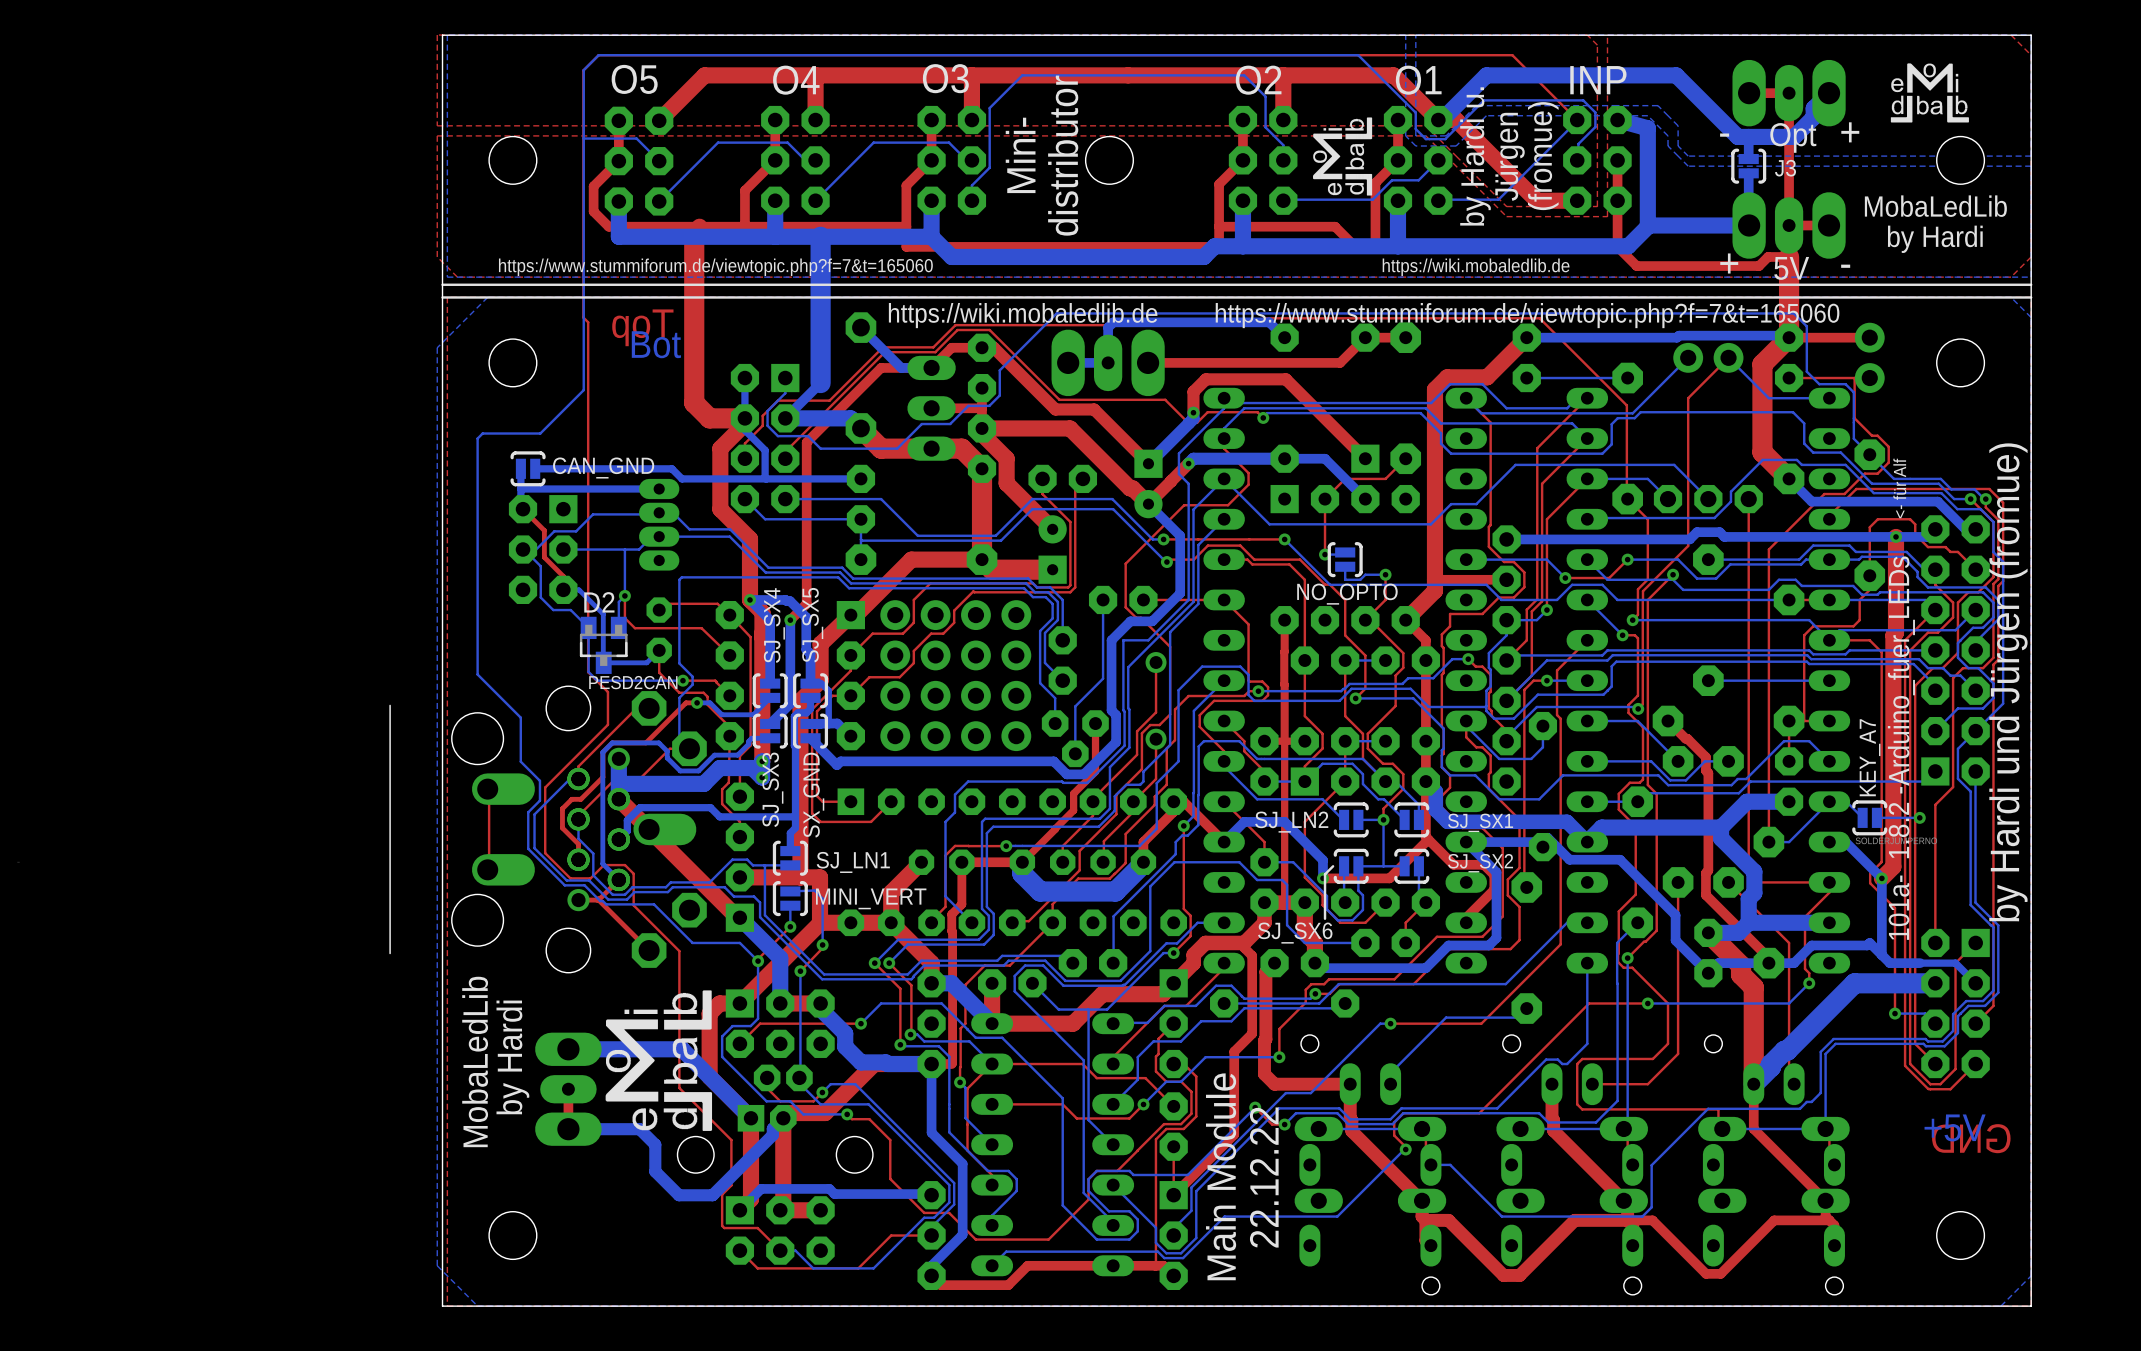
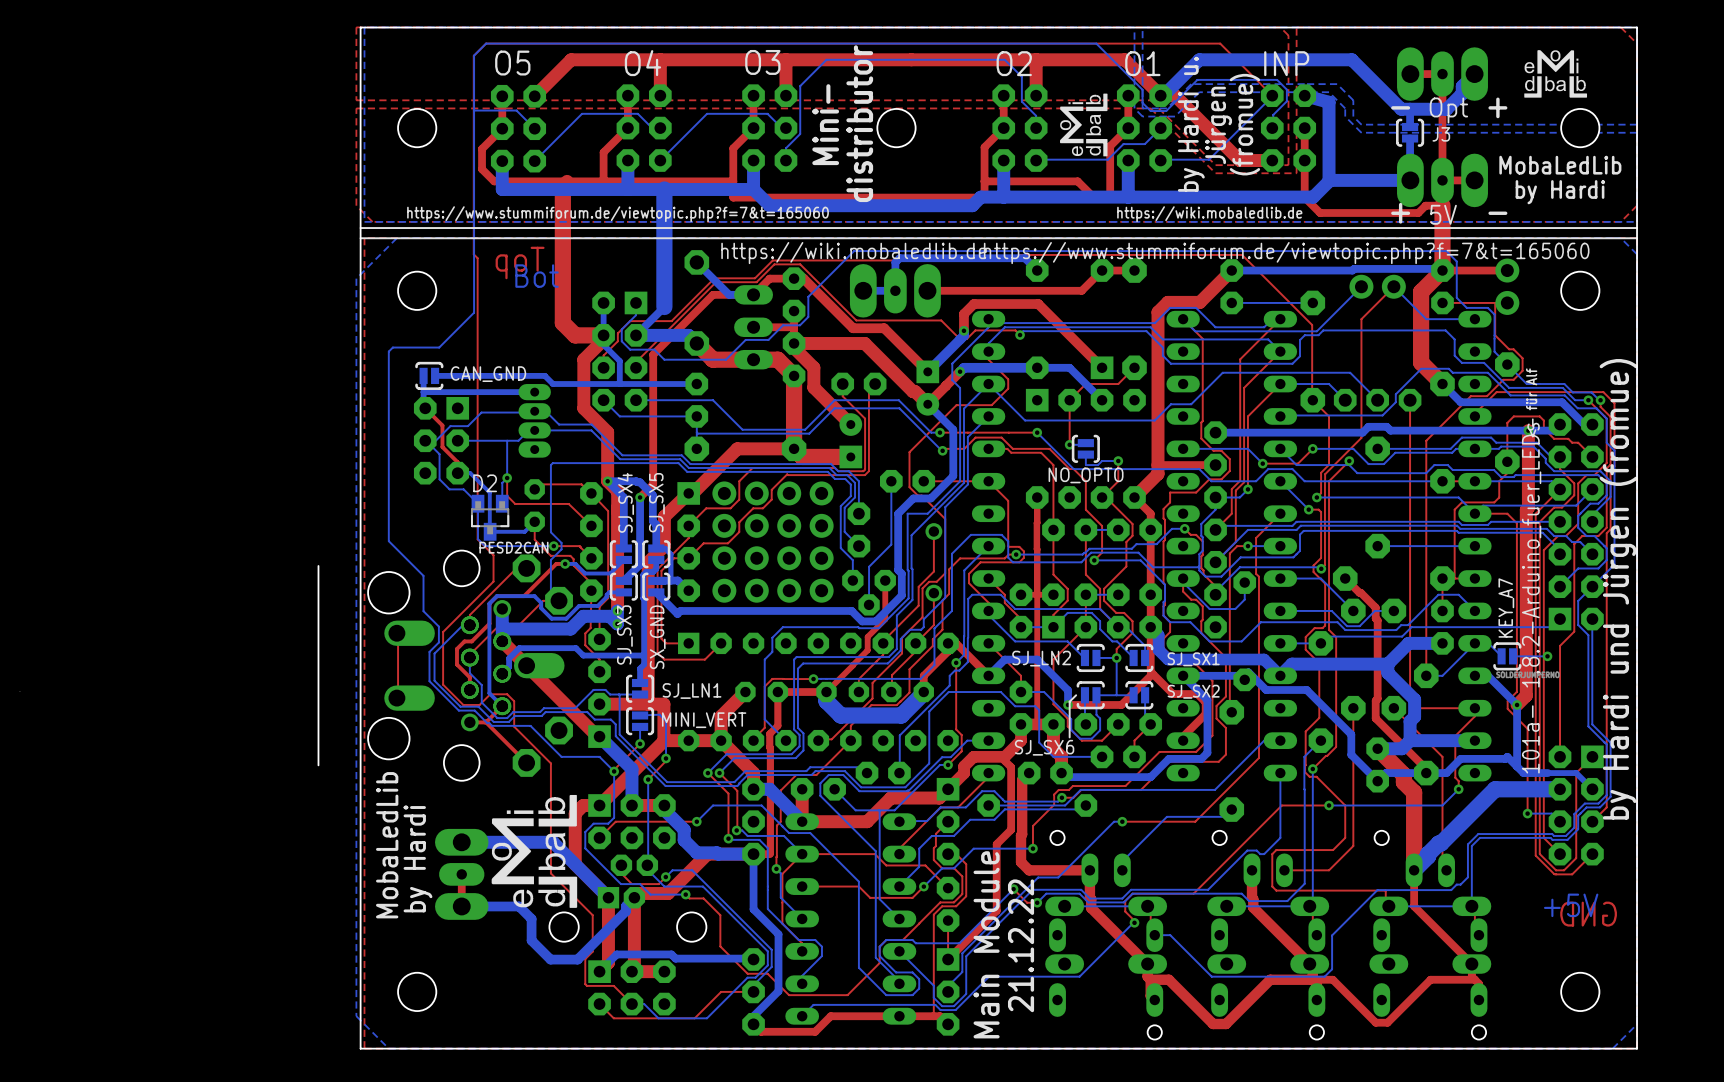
text: 22.12.22 (1264, 1177) -> 21.12.22 (1021, 945)

